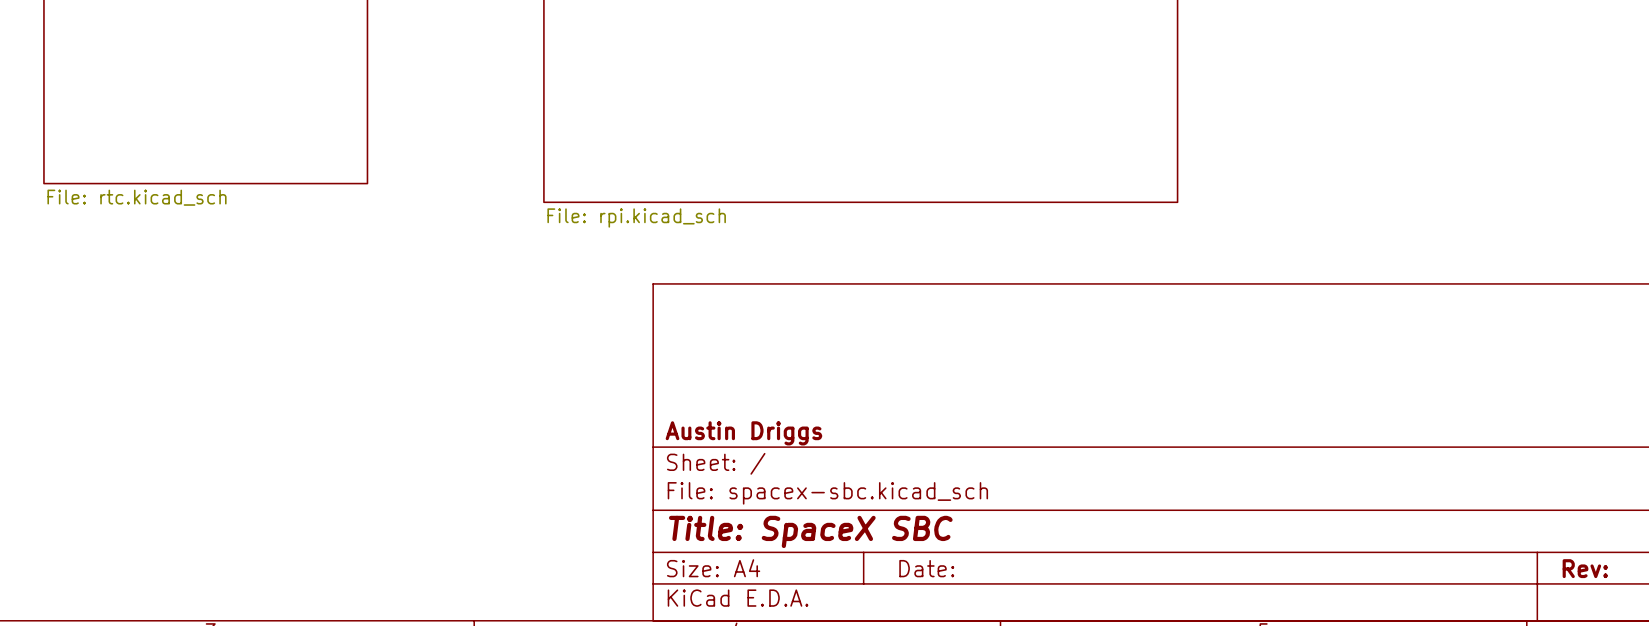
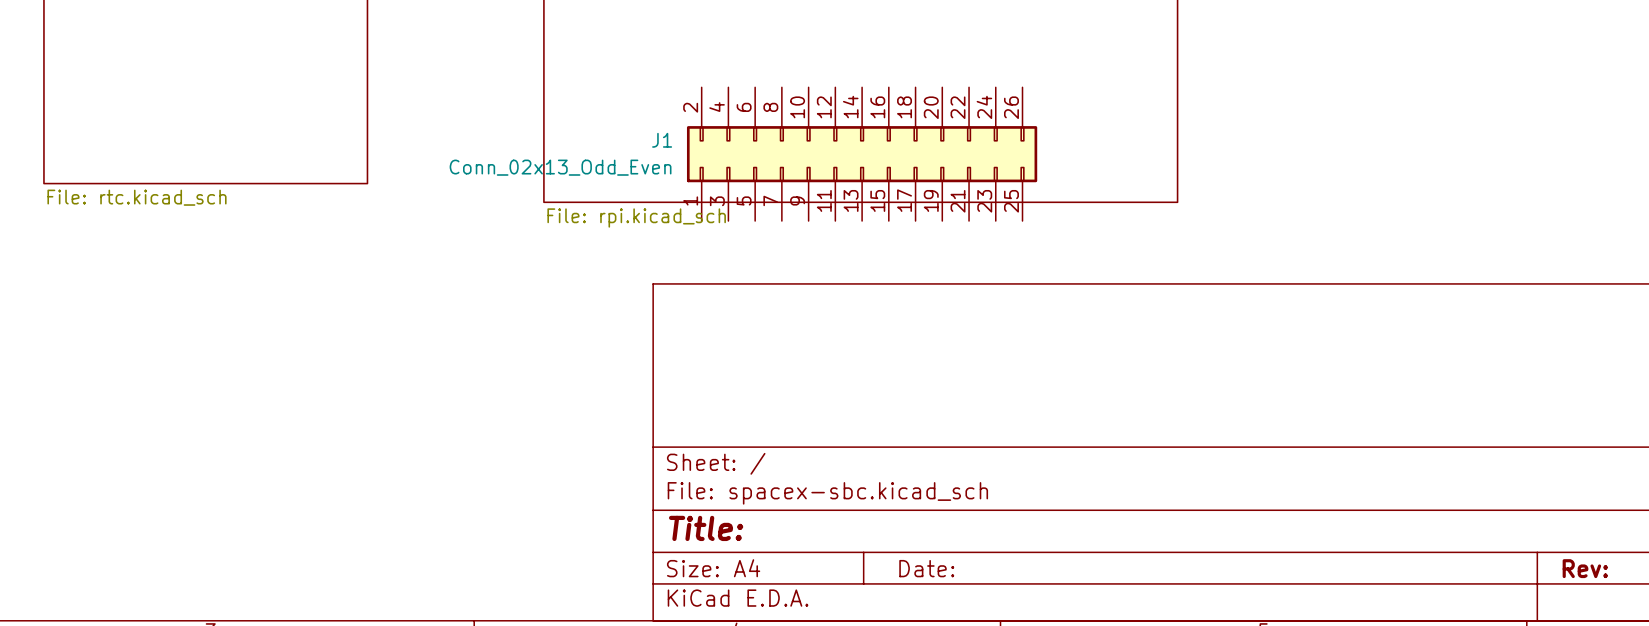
J1: none -> Conn_02x13_Odd_Even (862, 154)
title block: Austin Driggs (743, 433) -> none
title block: Title: SpaceX SBC (810, 531) -> Title: (706, 528)

